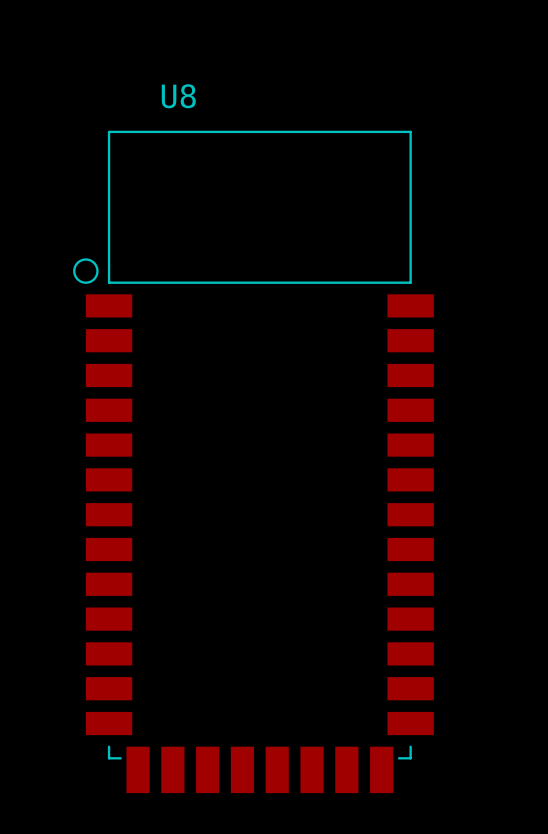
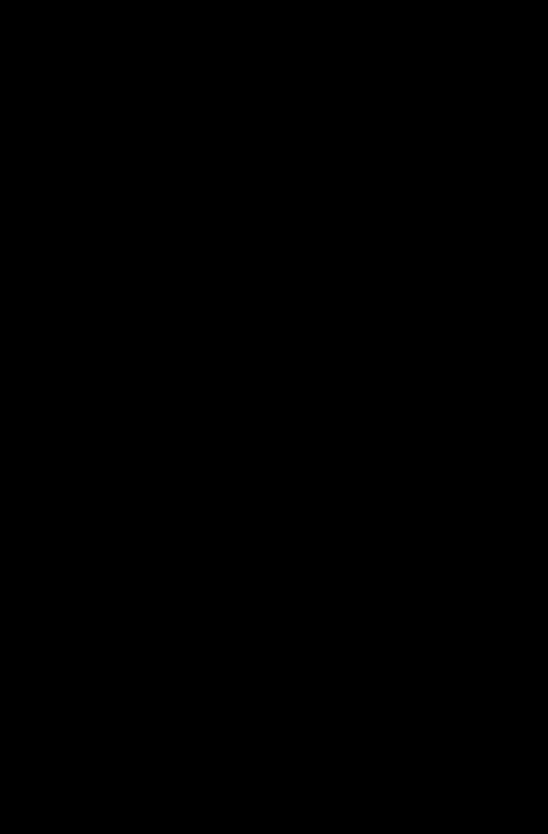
U8: (253, 461) -> none

